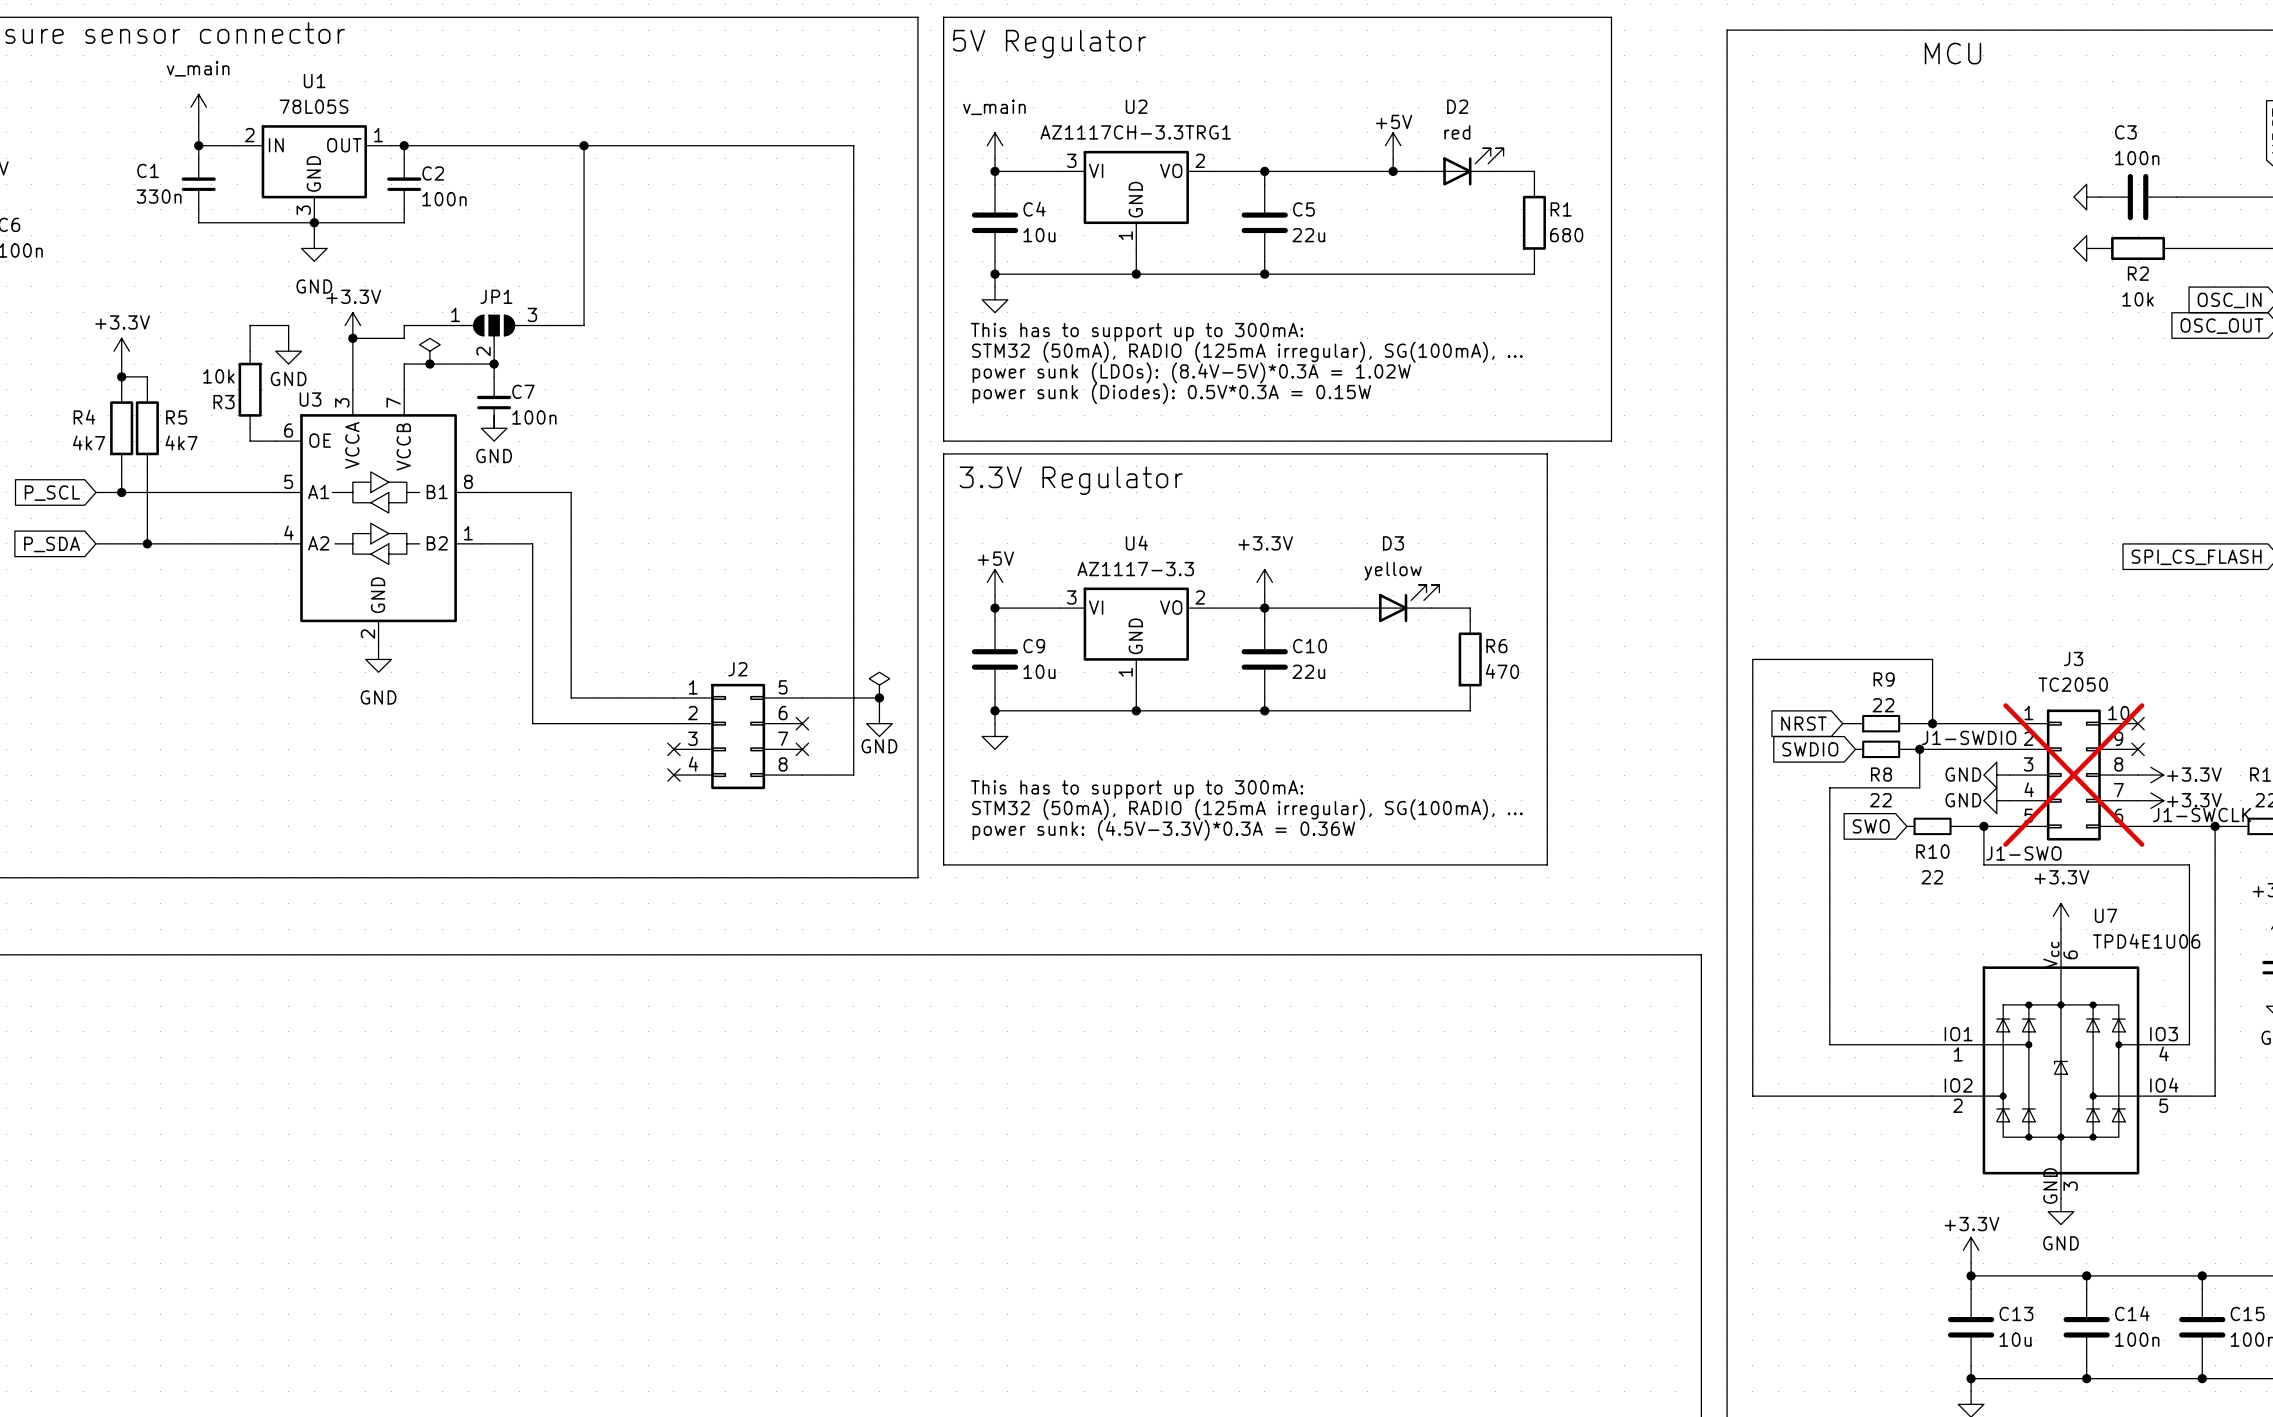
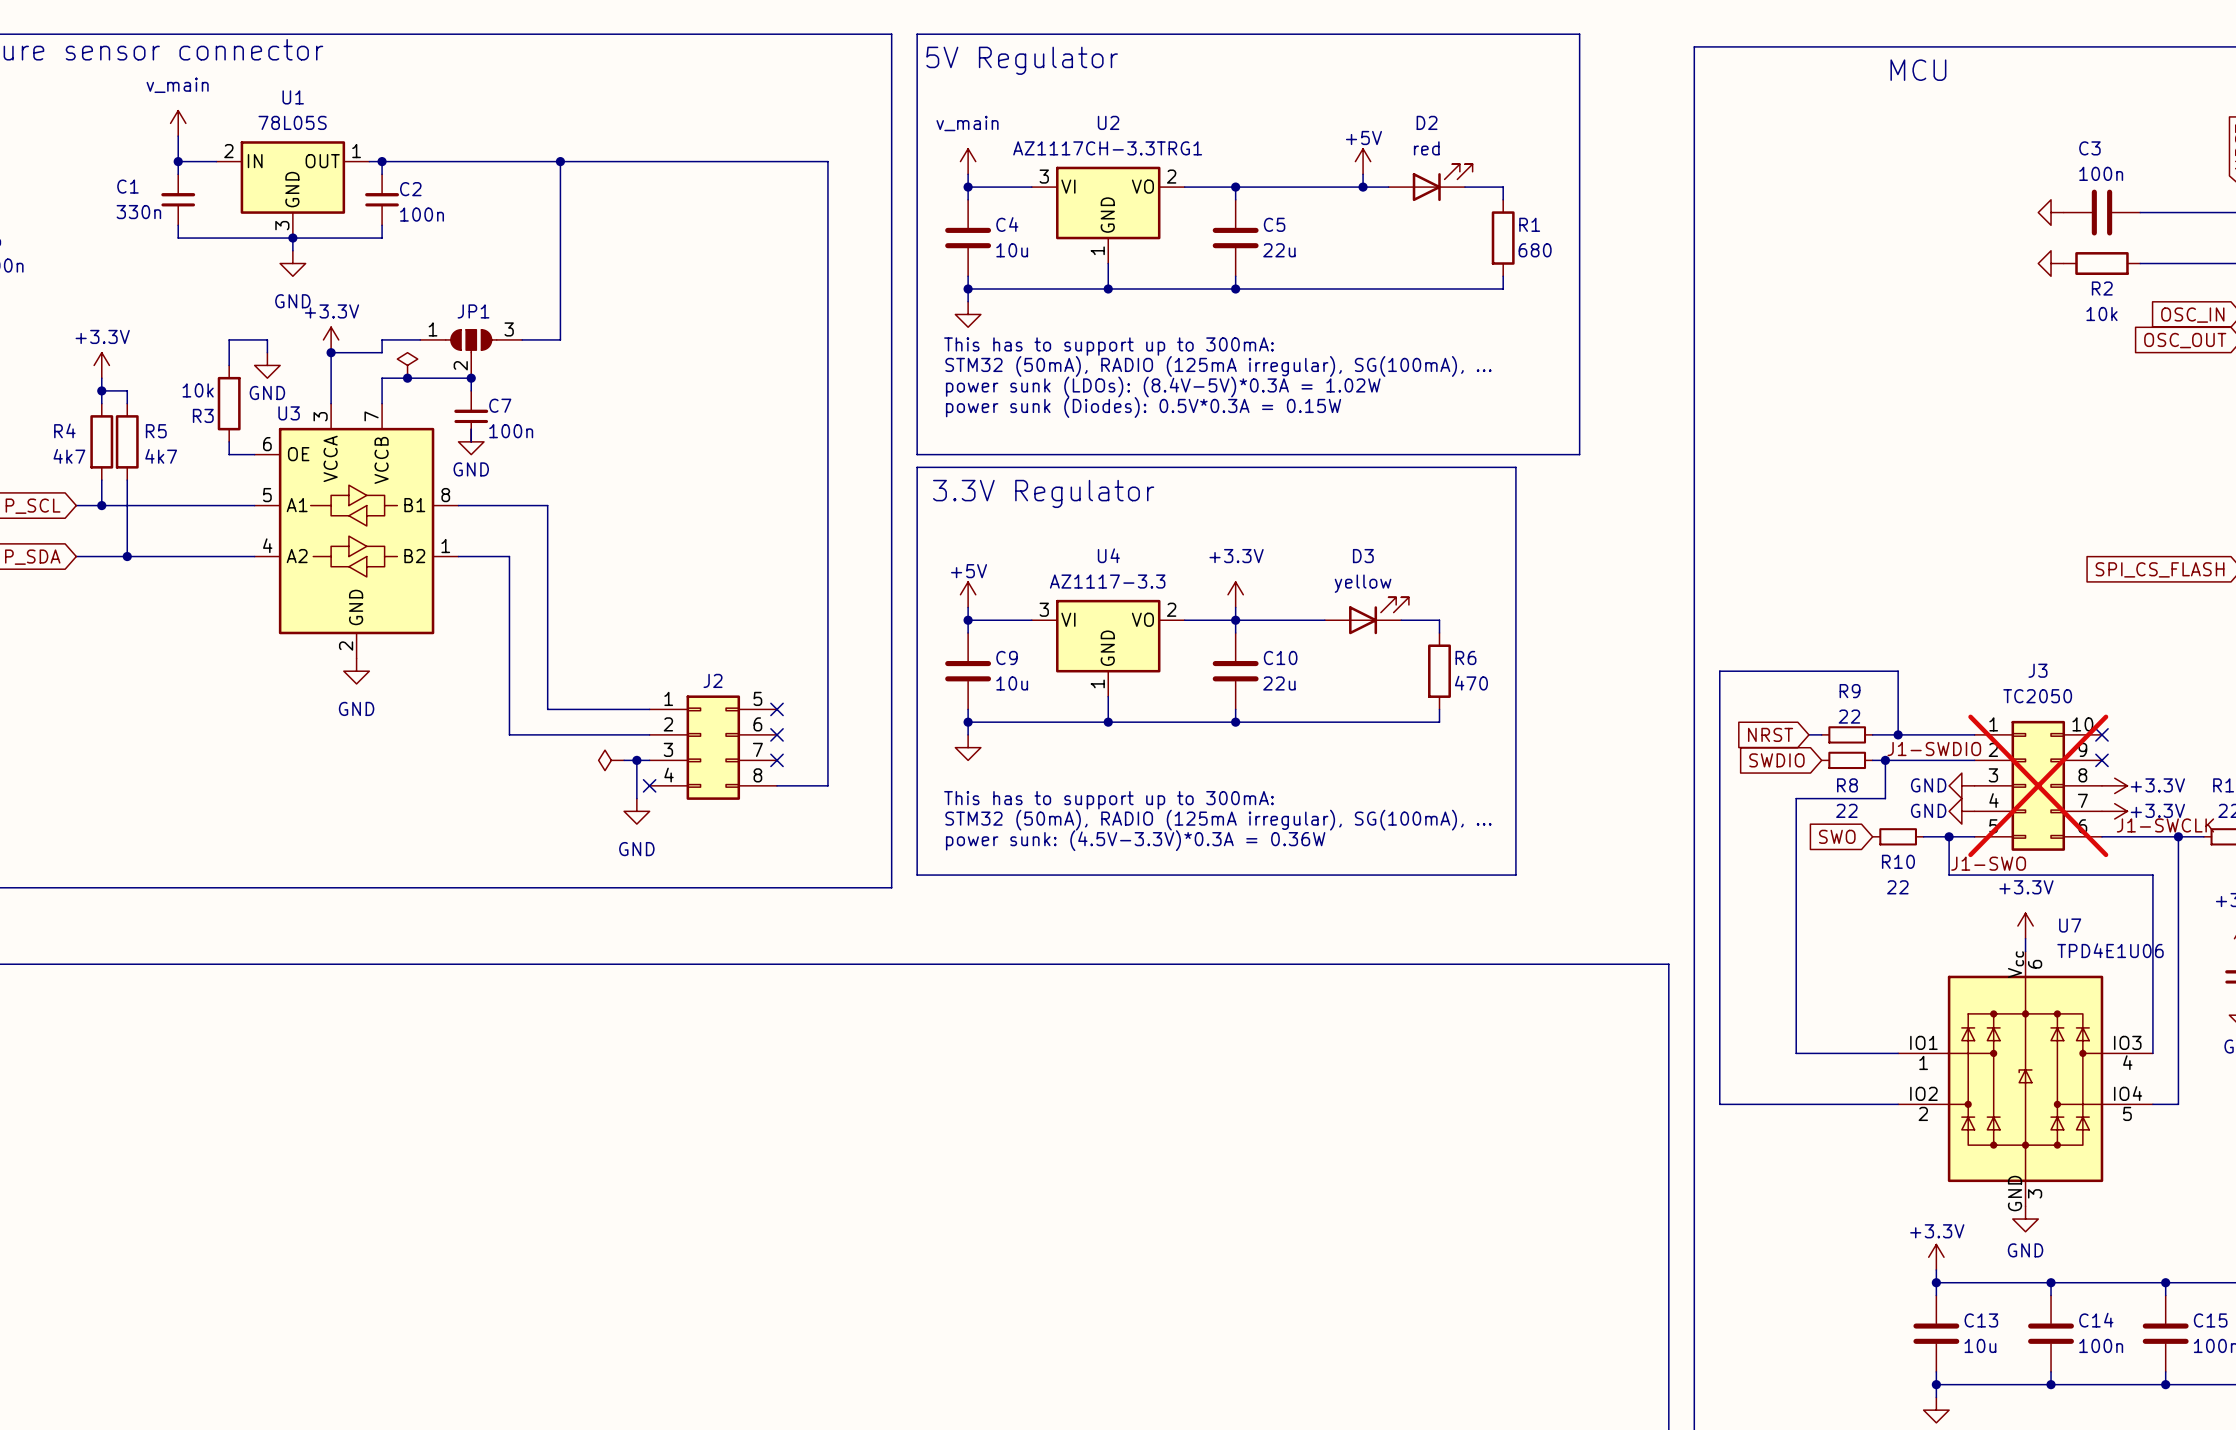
power symbol rotation: 0° (879, 685) -> 90° counterclockwise (611, 760)
power symbol position: (879, 685) -> (611, 760)
wire: (802, 697) (879, 697) (879, 710) -> none
no-connect mark: none -> (777, 709)
junction: (879, 697) -> none
power symbol position: GND (879, 723) -> GND (636, 811)
power symbol text position: GND (879, 746) -> GND (636, 849)
wire: none -> (624, 760) (649, 760)
wire: none -> (636, 760) (636, 798)
junction: none -> (636, 760)
no-connect mark: (673, 749) -> none

